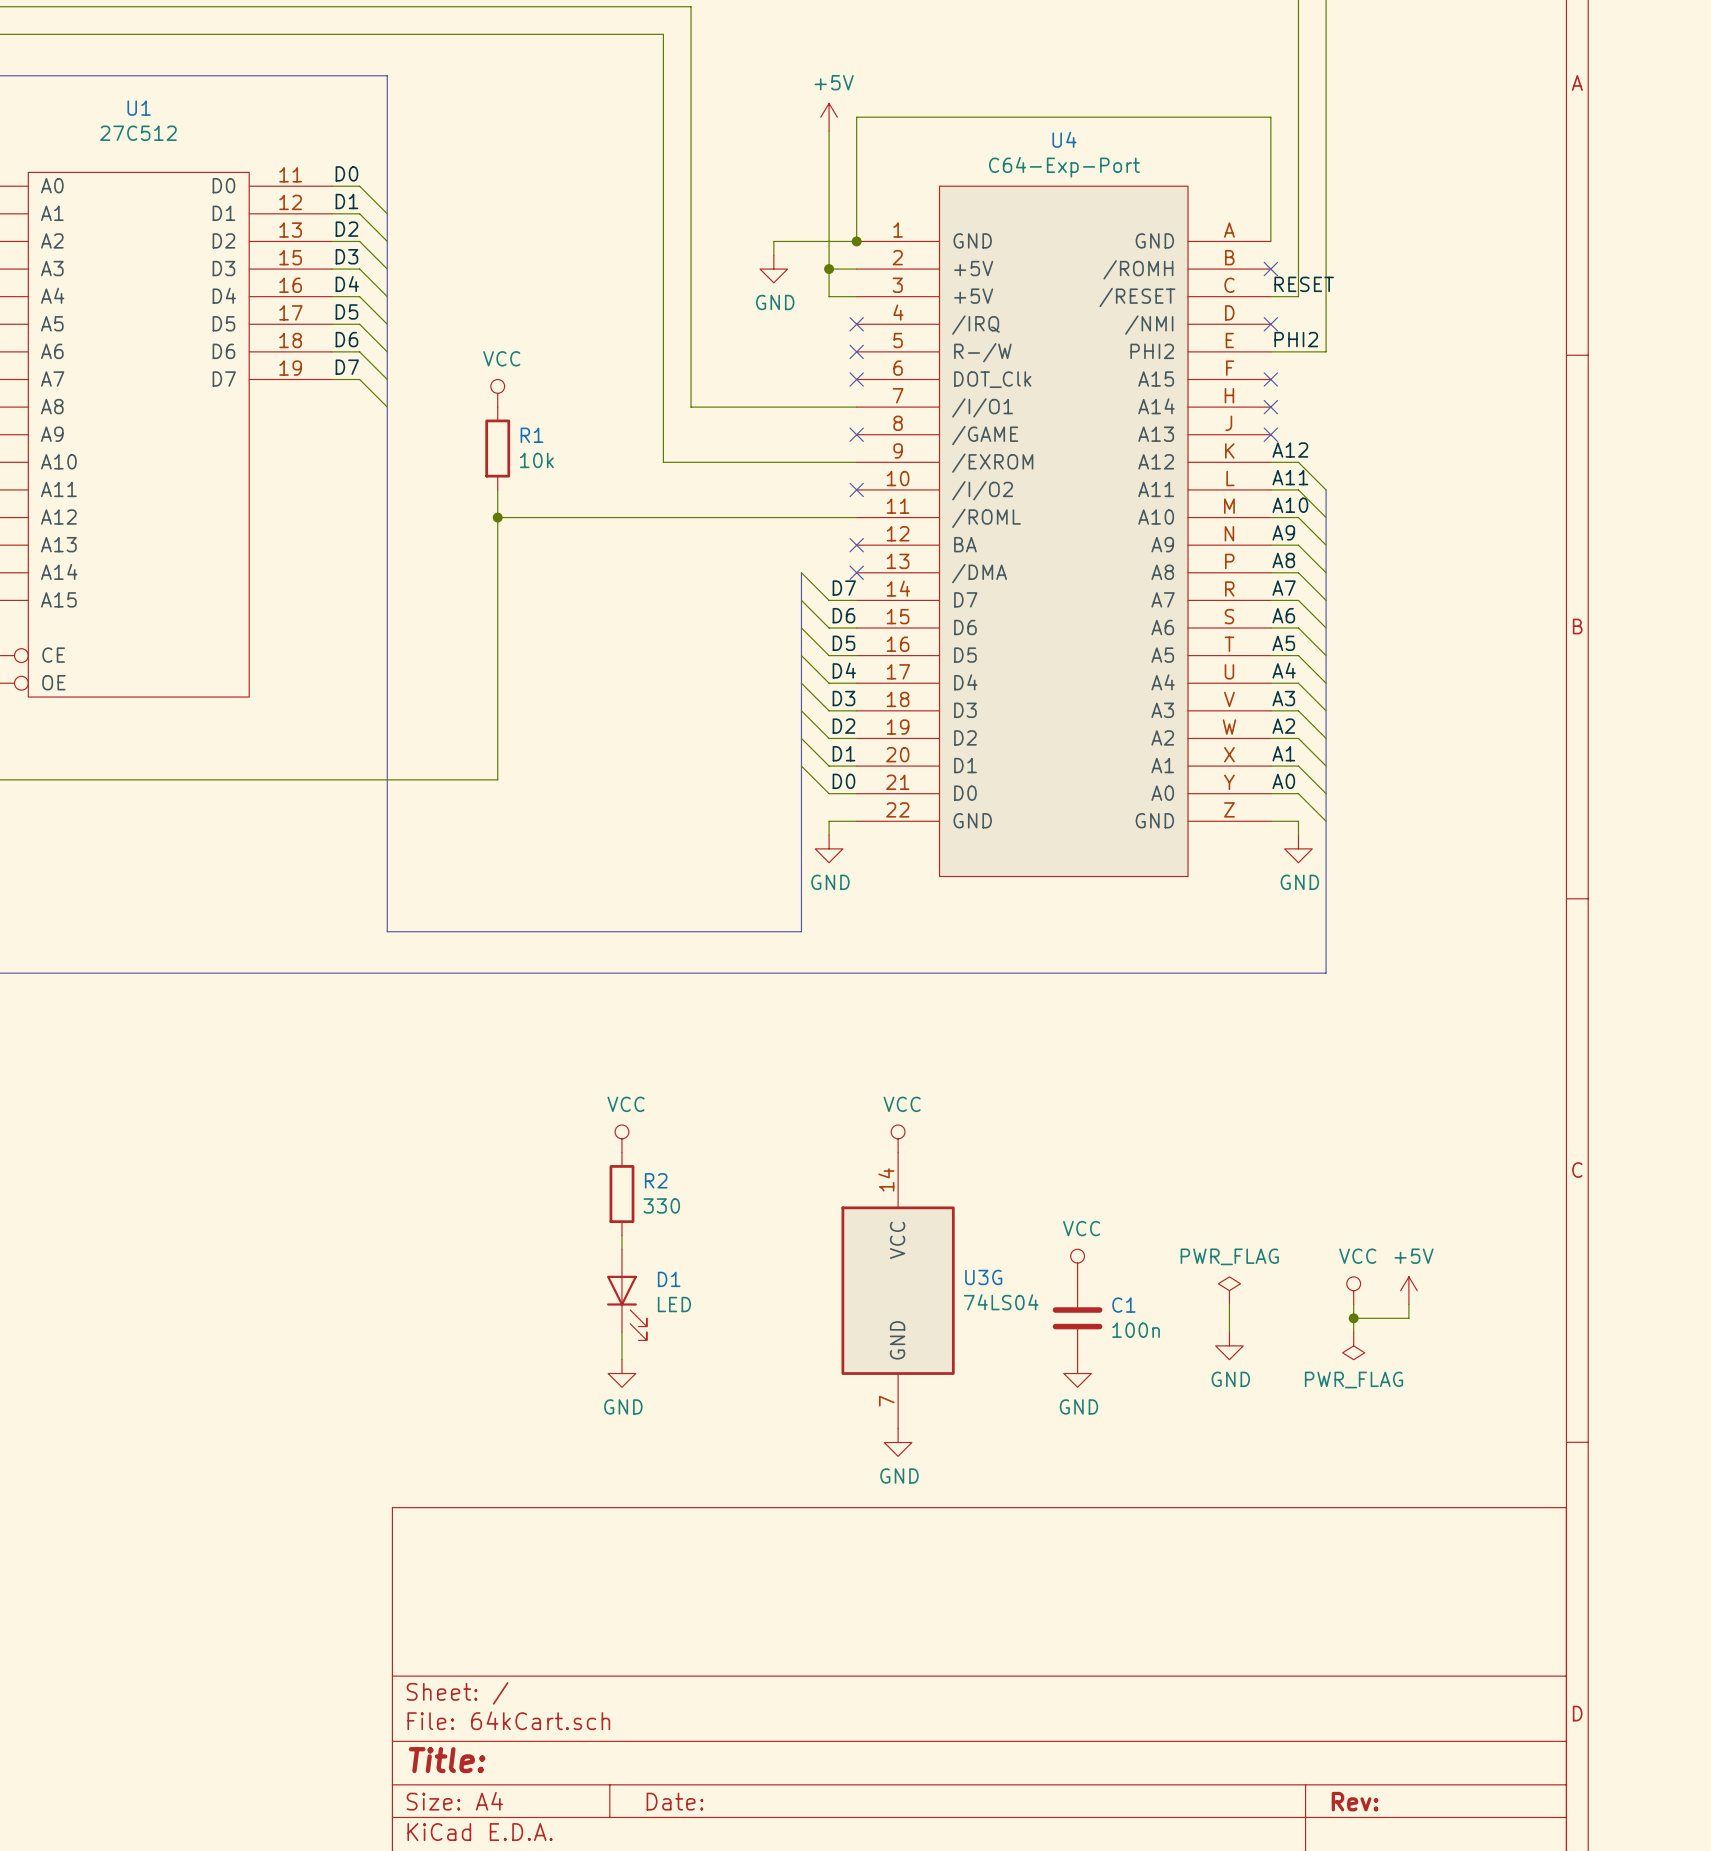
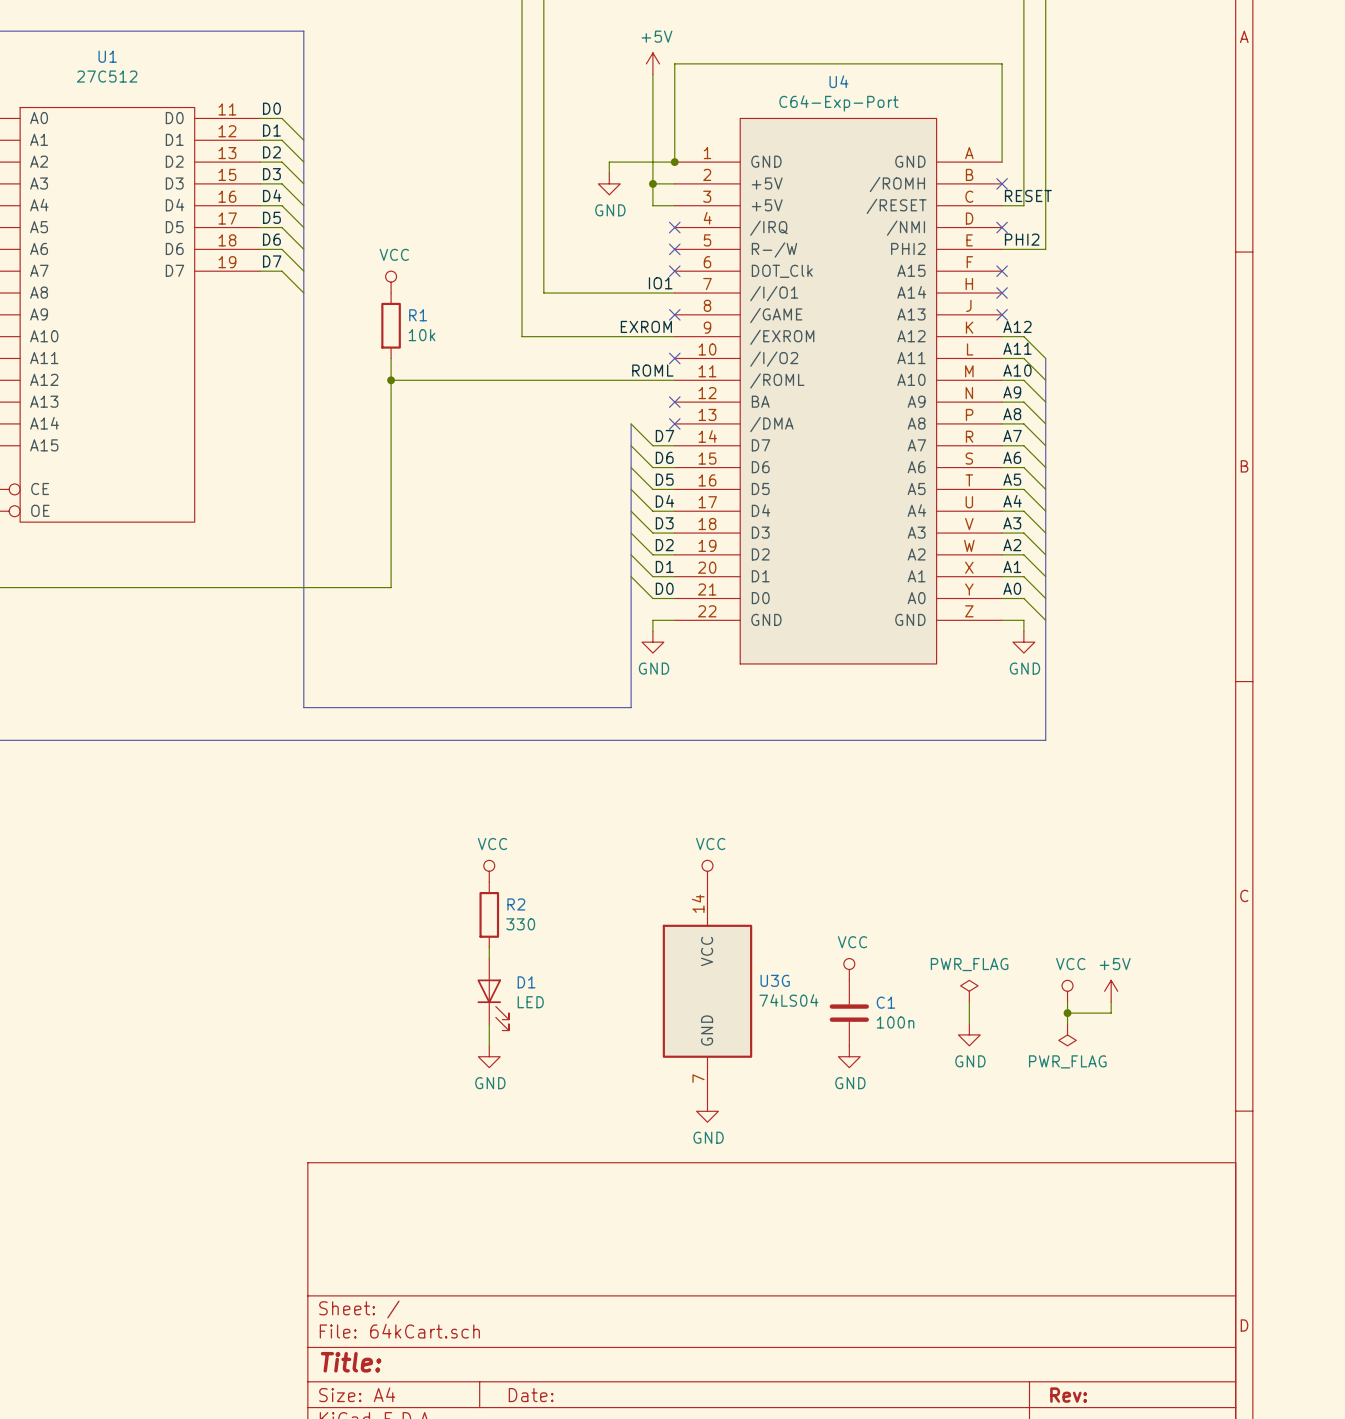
label: none -> IO1 (660, 283)
label: none -> EXROM (646, 326)
label: none -> ROML (652, 370)

